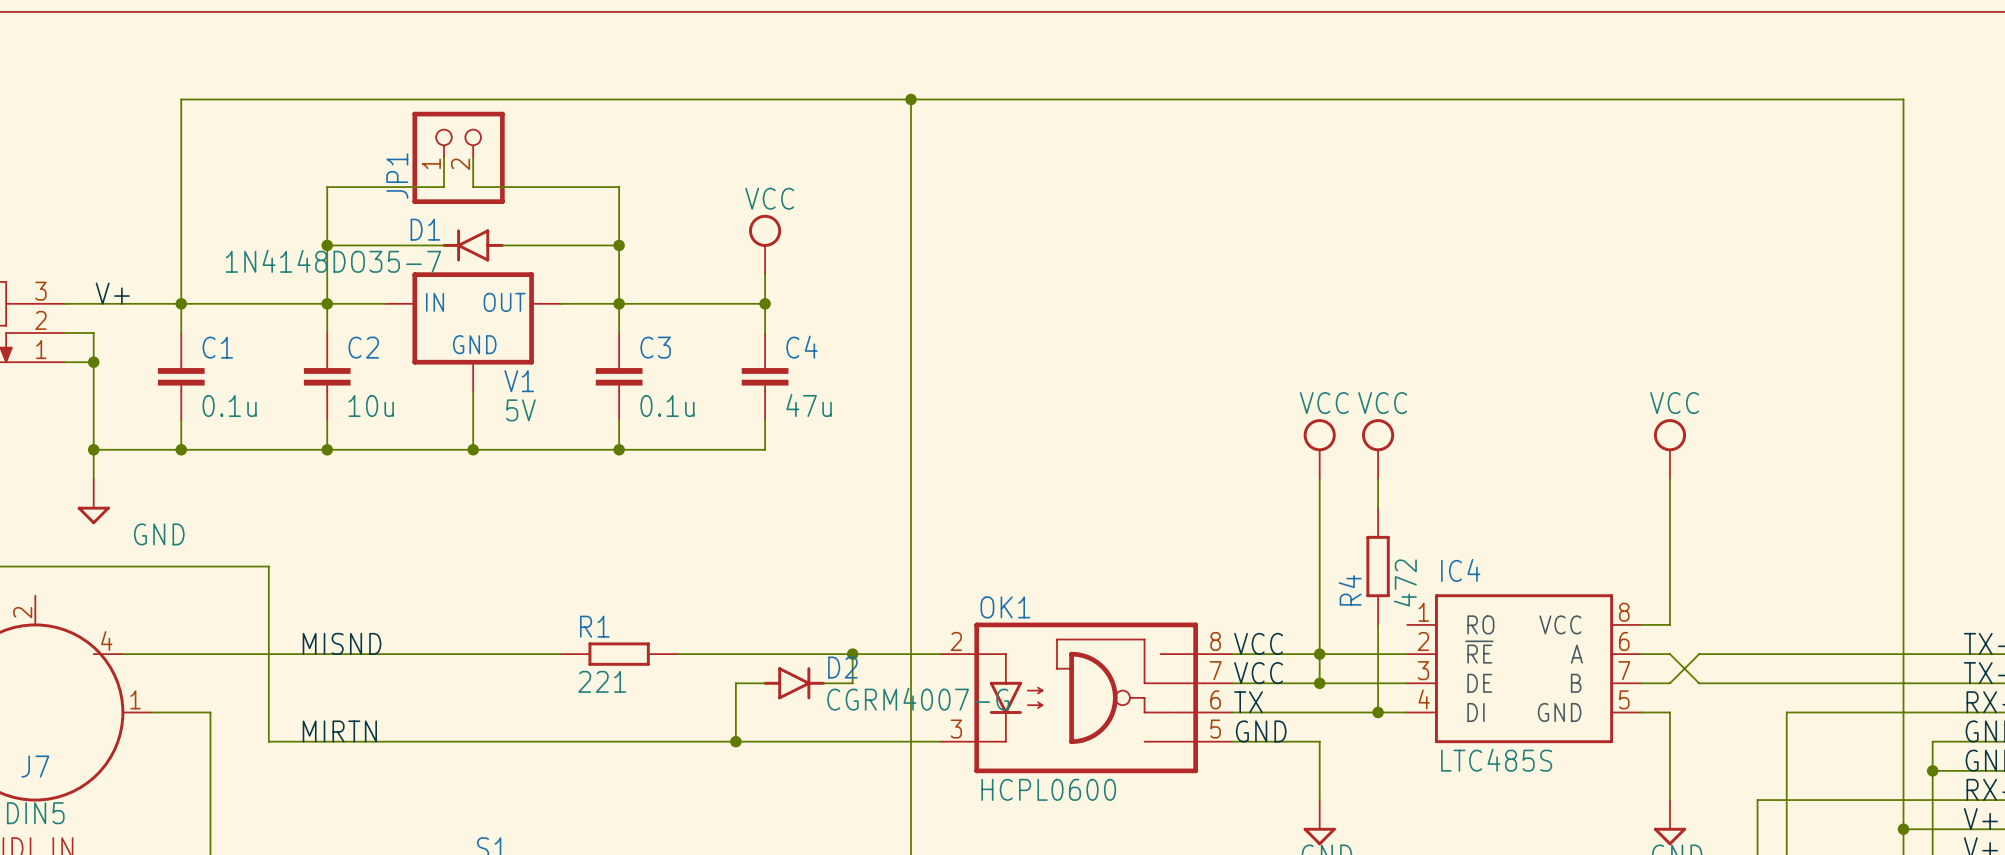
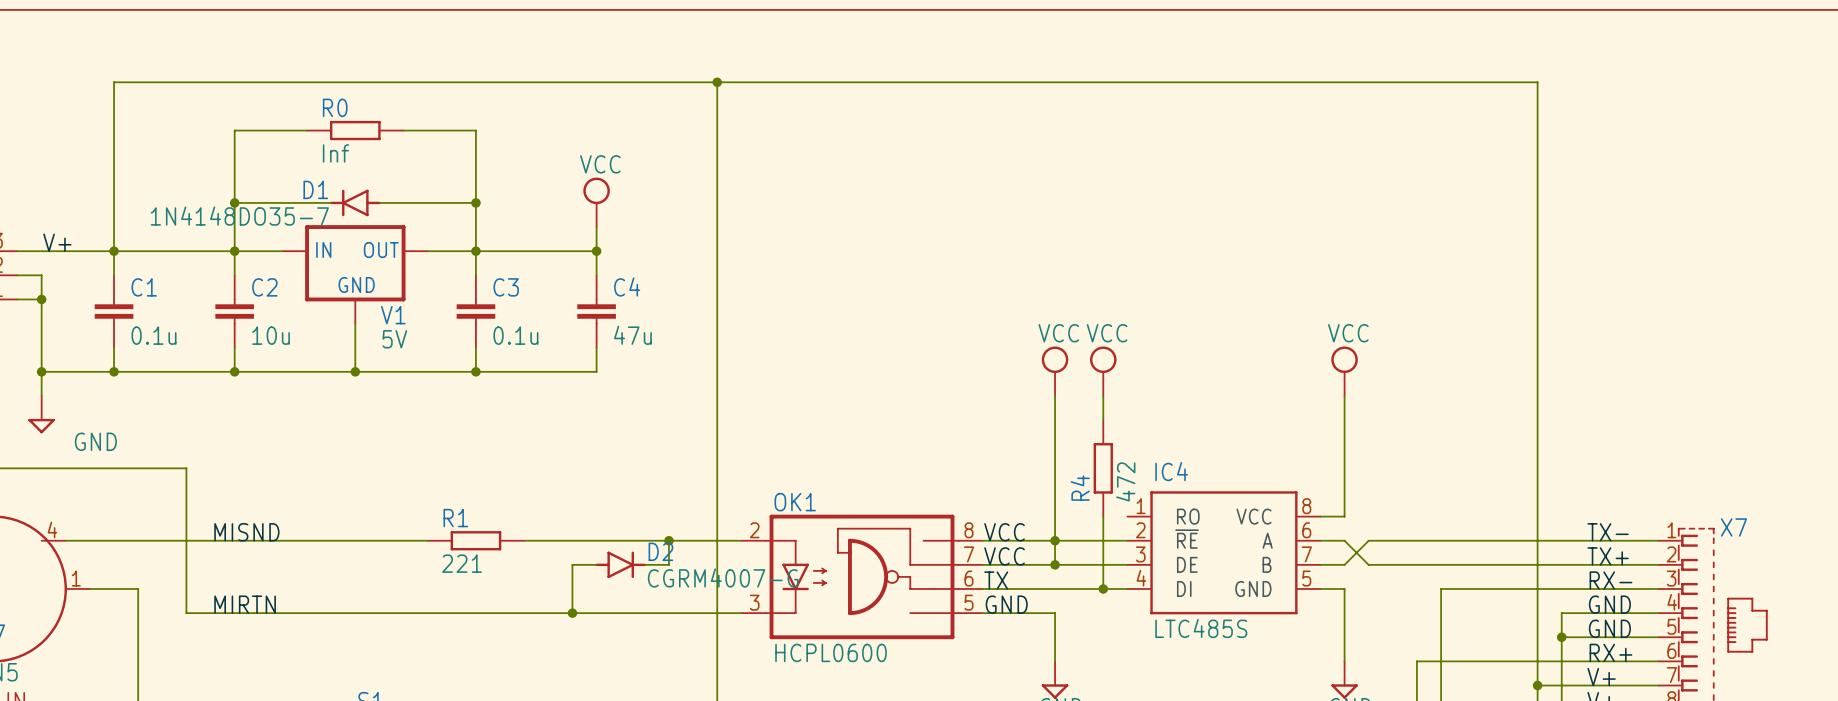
wire: (443, 157) (443, 187) (327, 187) -> (307, 130) (234, 130) (234, 154)
JP1: (458, 157) -> none
wire: (473, 157) (473, 187) (619, 187) -> (403, 130) (475, 130) (475, 154)
R0: none -> Inf (355, 130)

